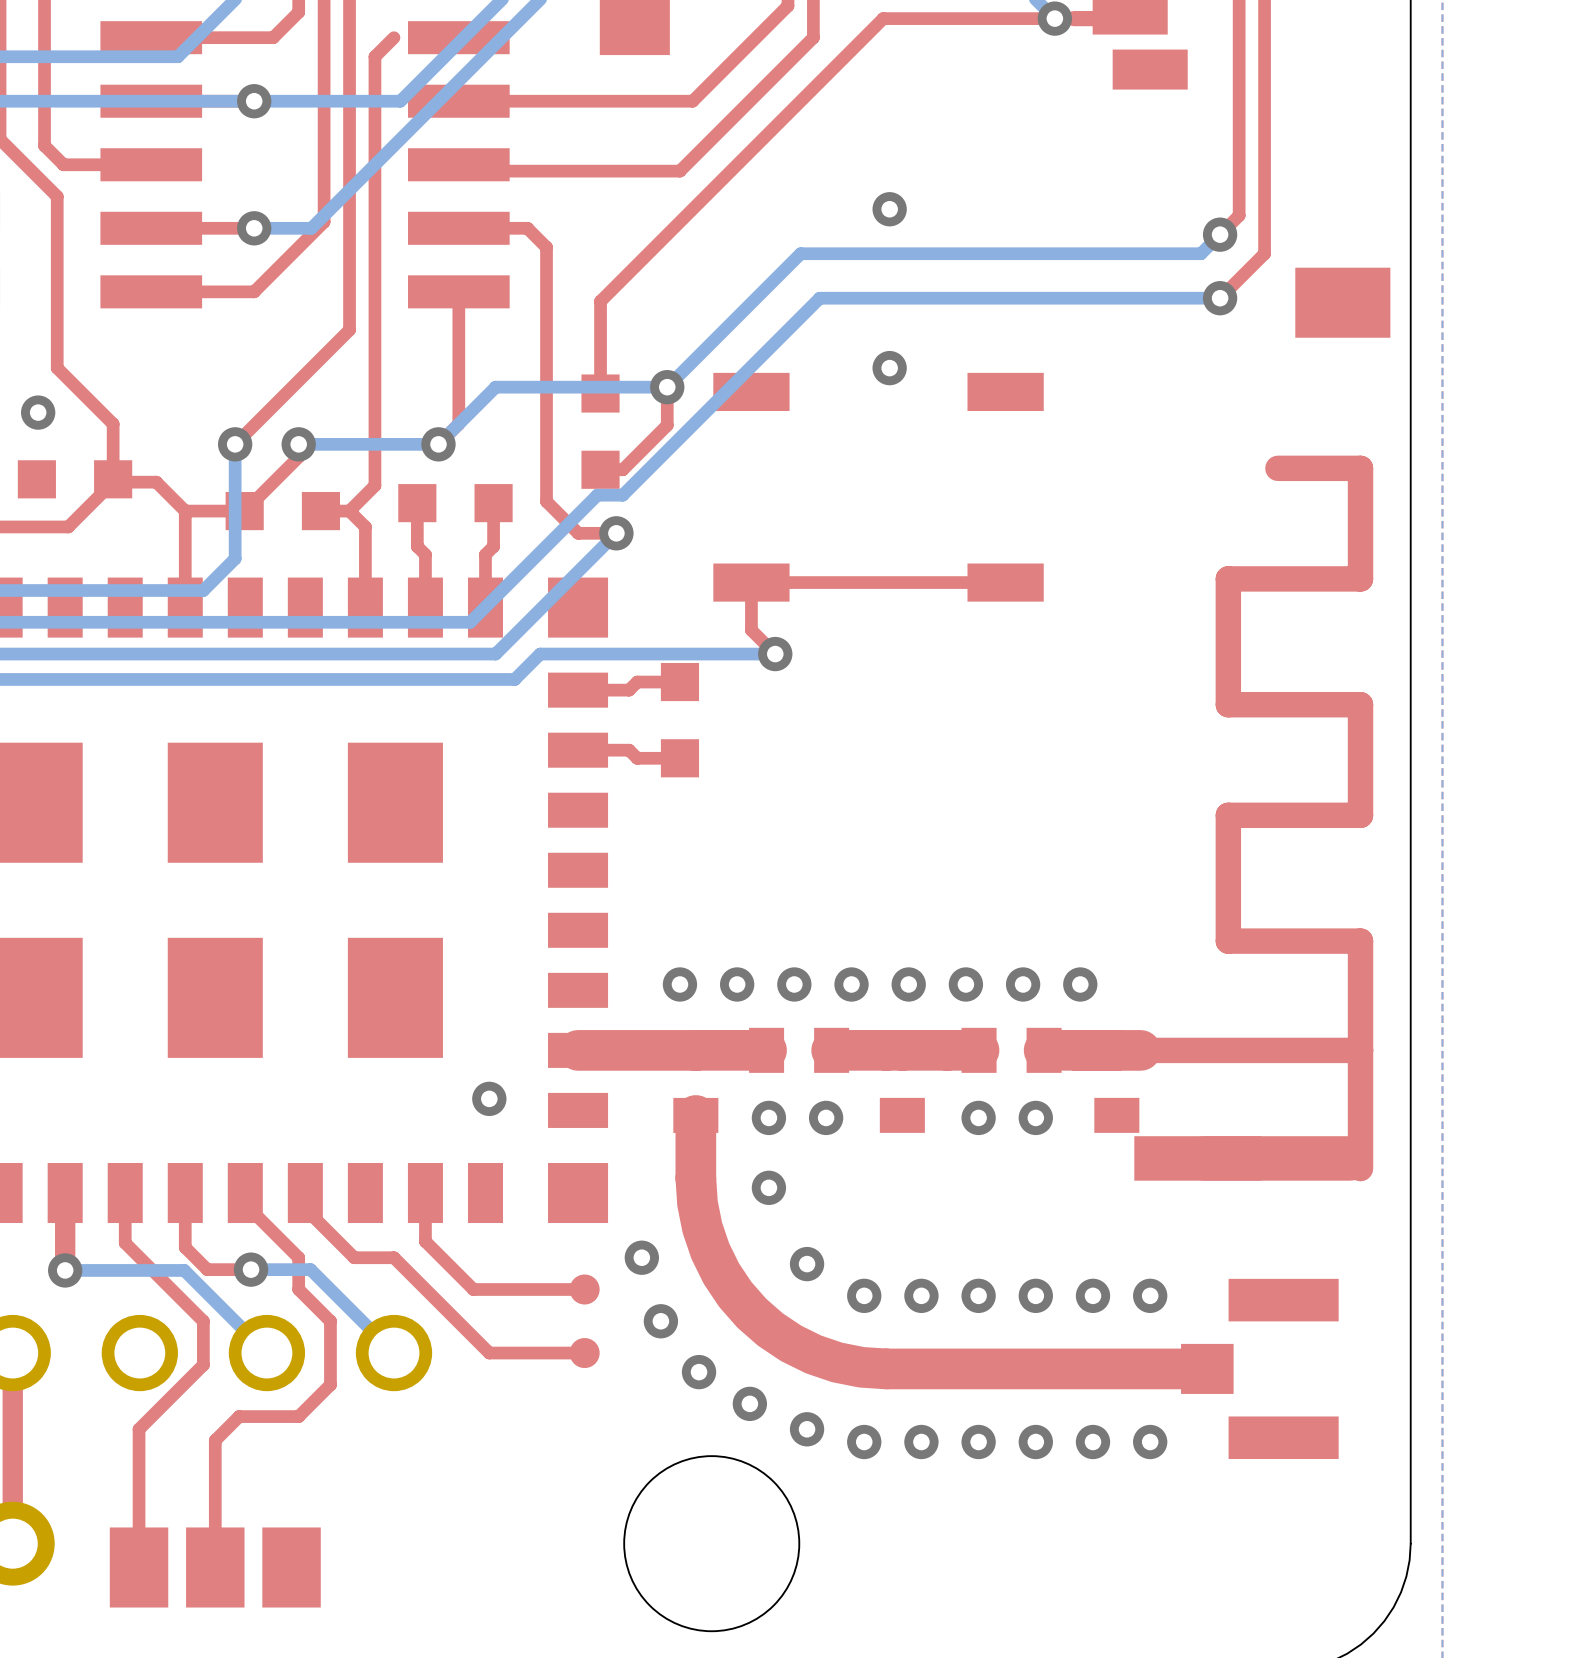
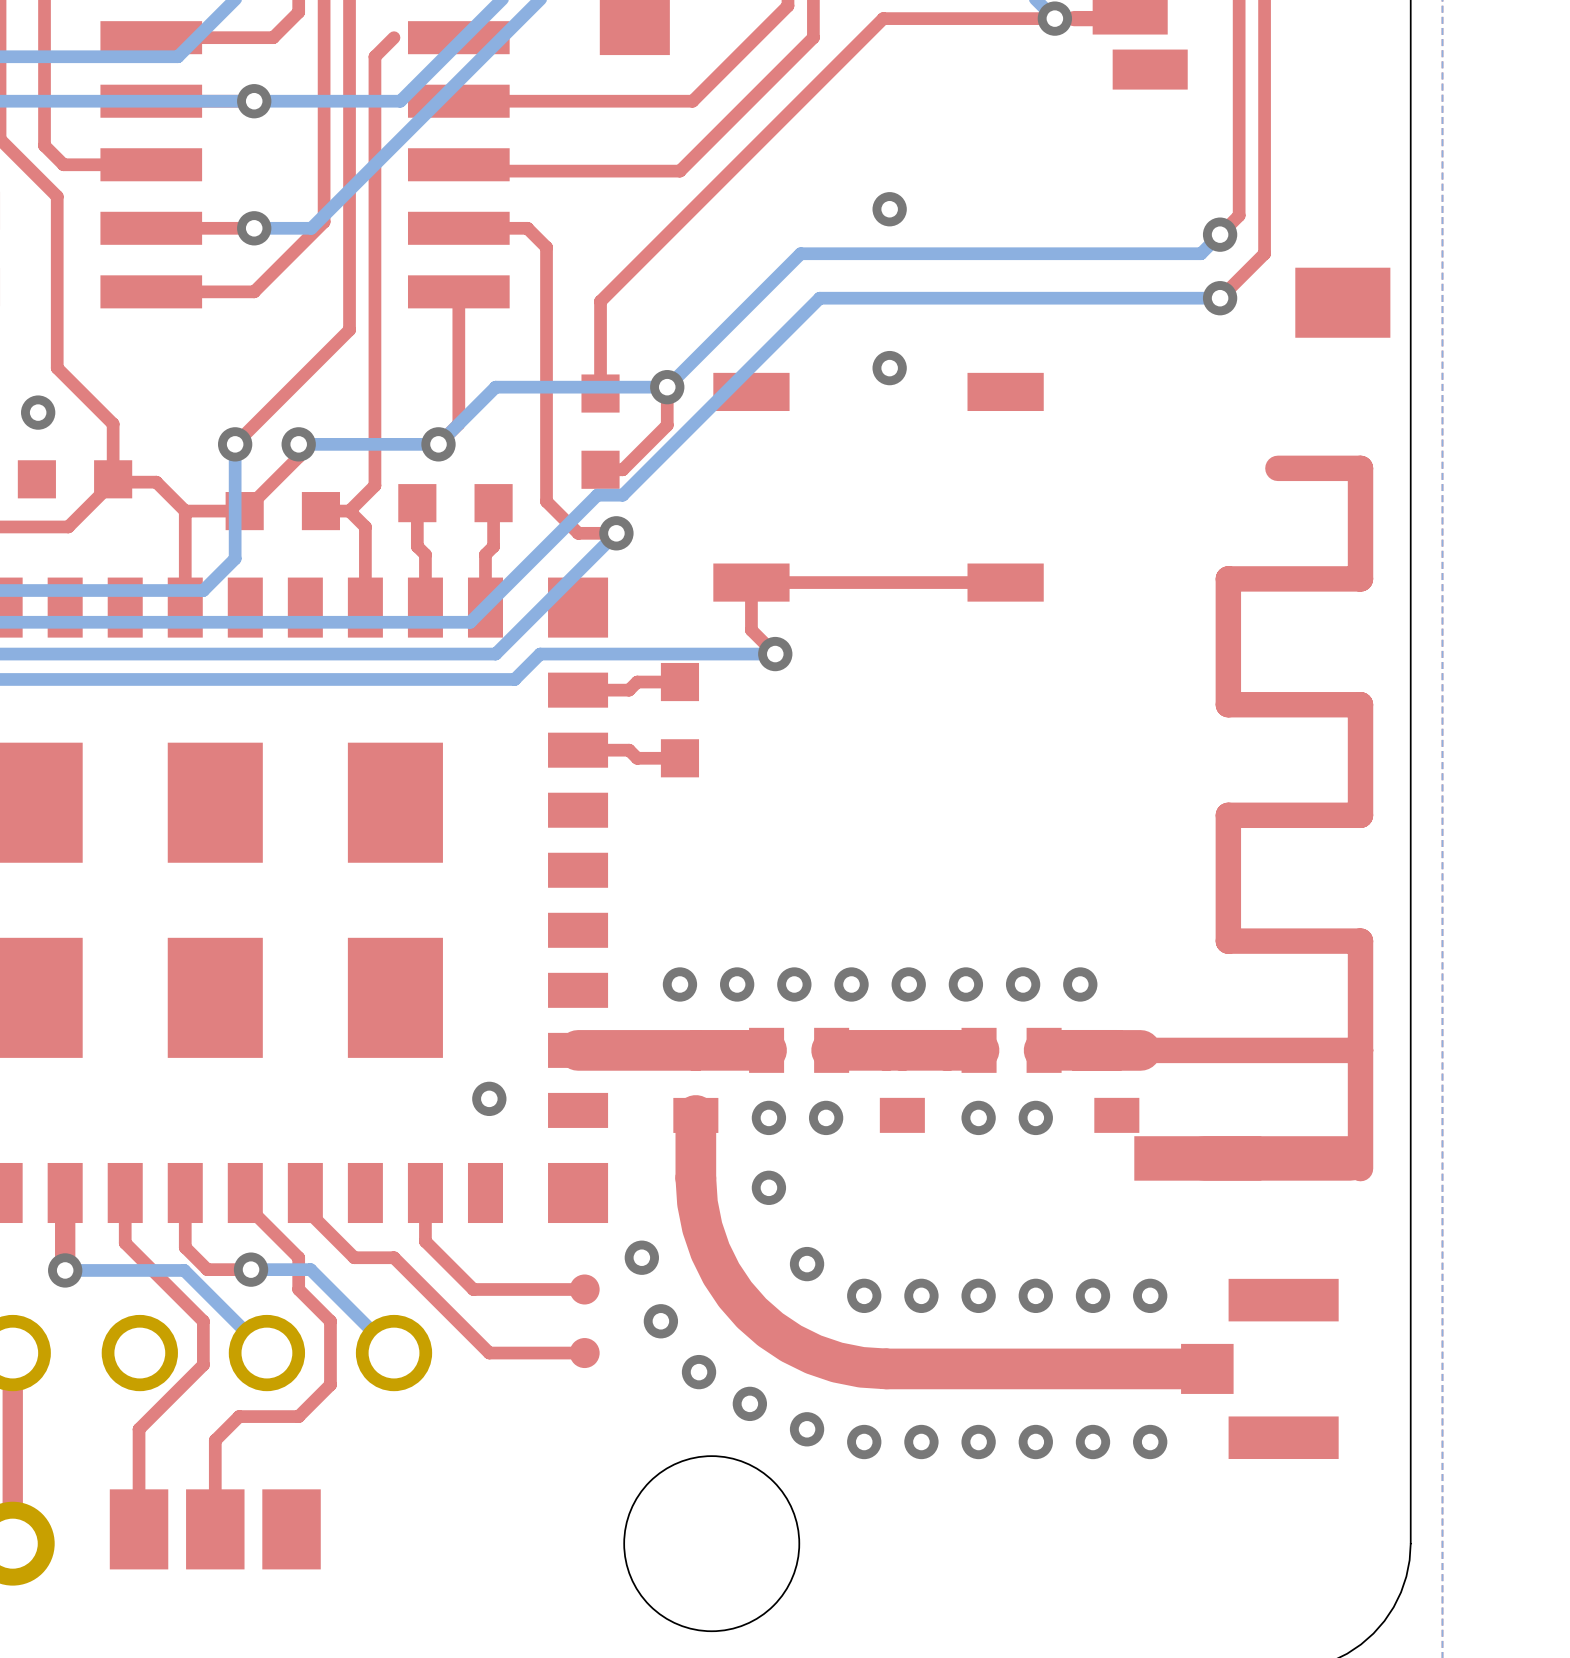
part position: (215, 1567) -> (215, 1529)

